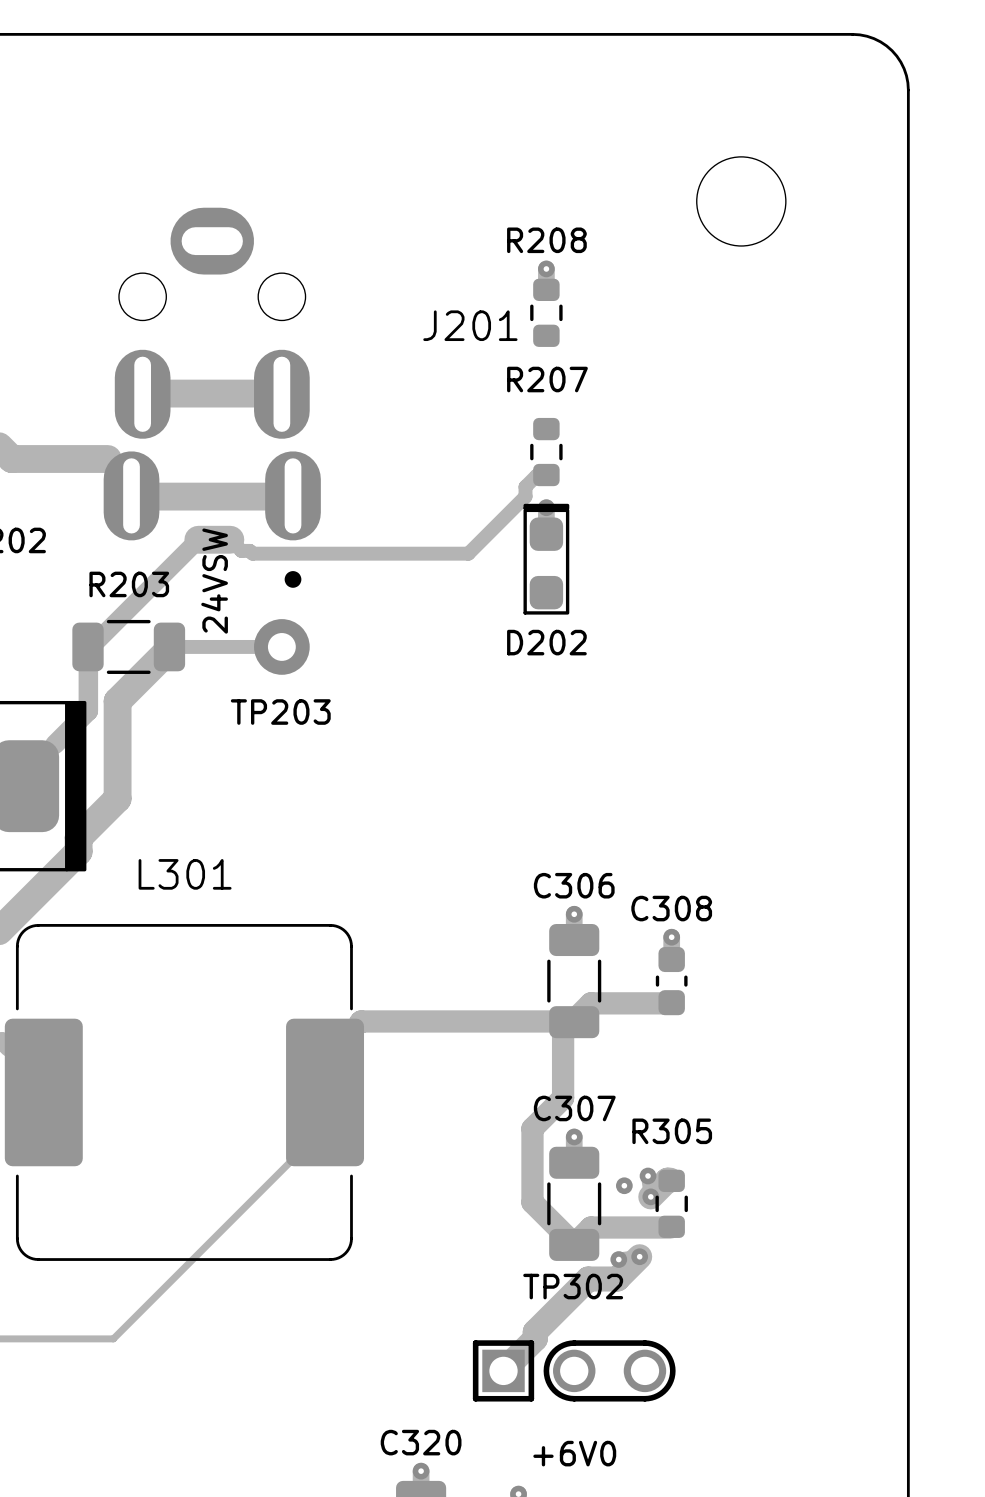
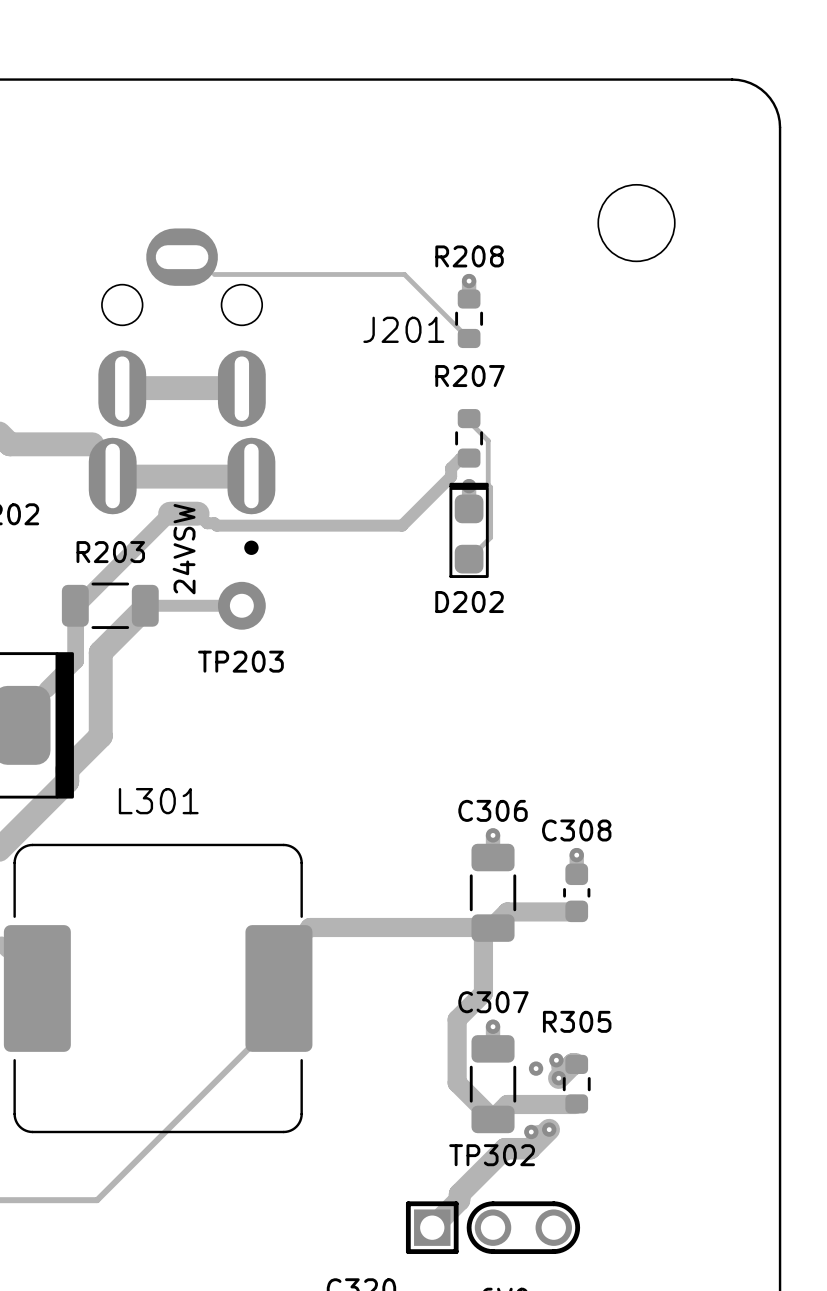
track: none -> (214, 274) (404, 274) (467, 337)
track: none -> (470, 419) (470, 422) (488, 440) (488, 484) (490, 487) (490, 537) (470, 557)

